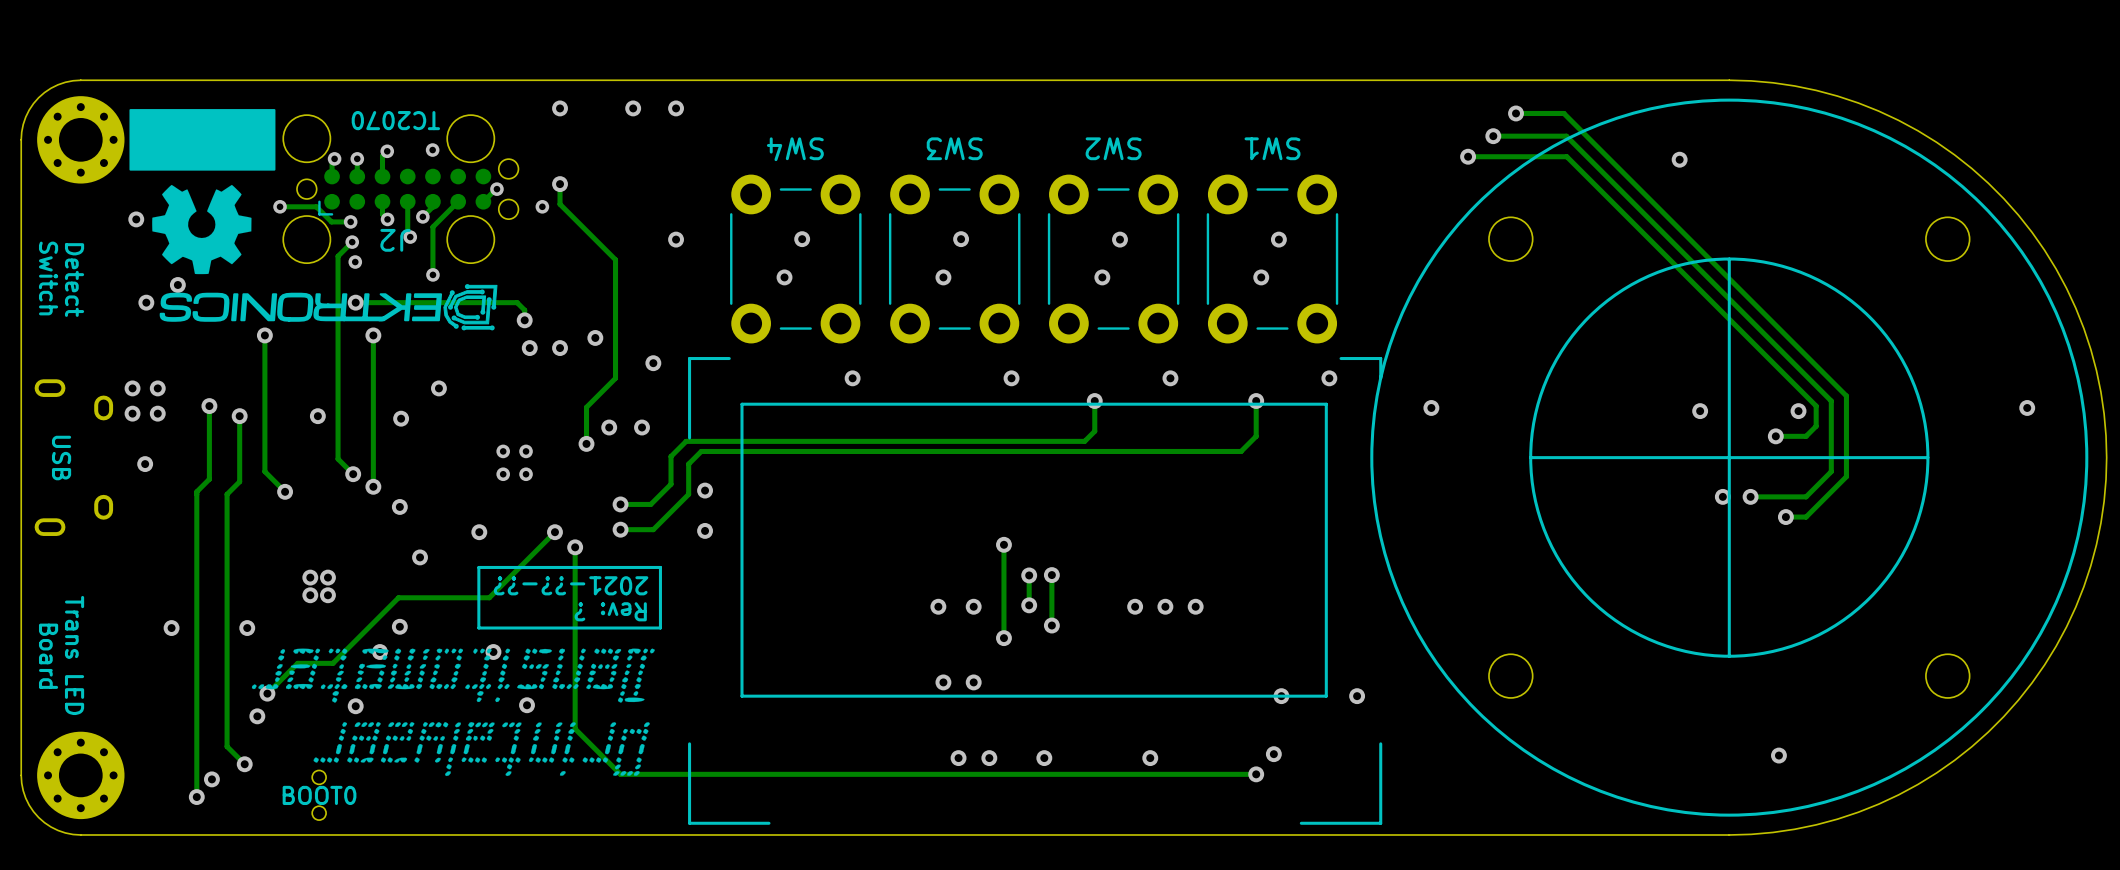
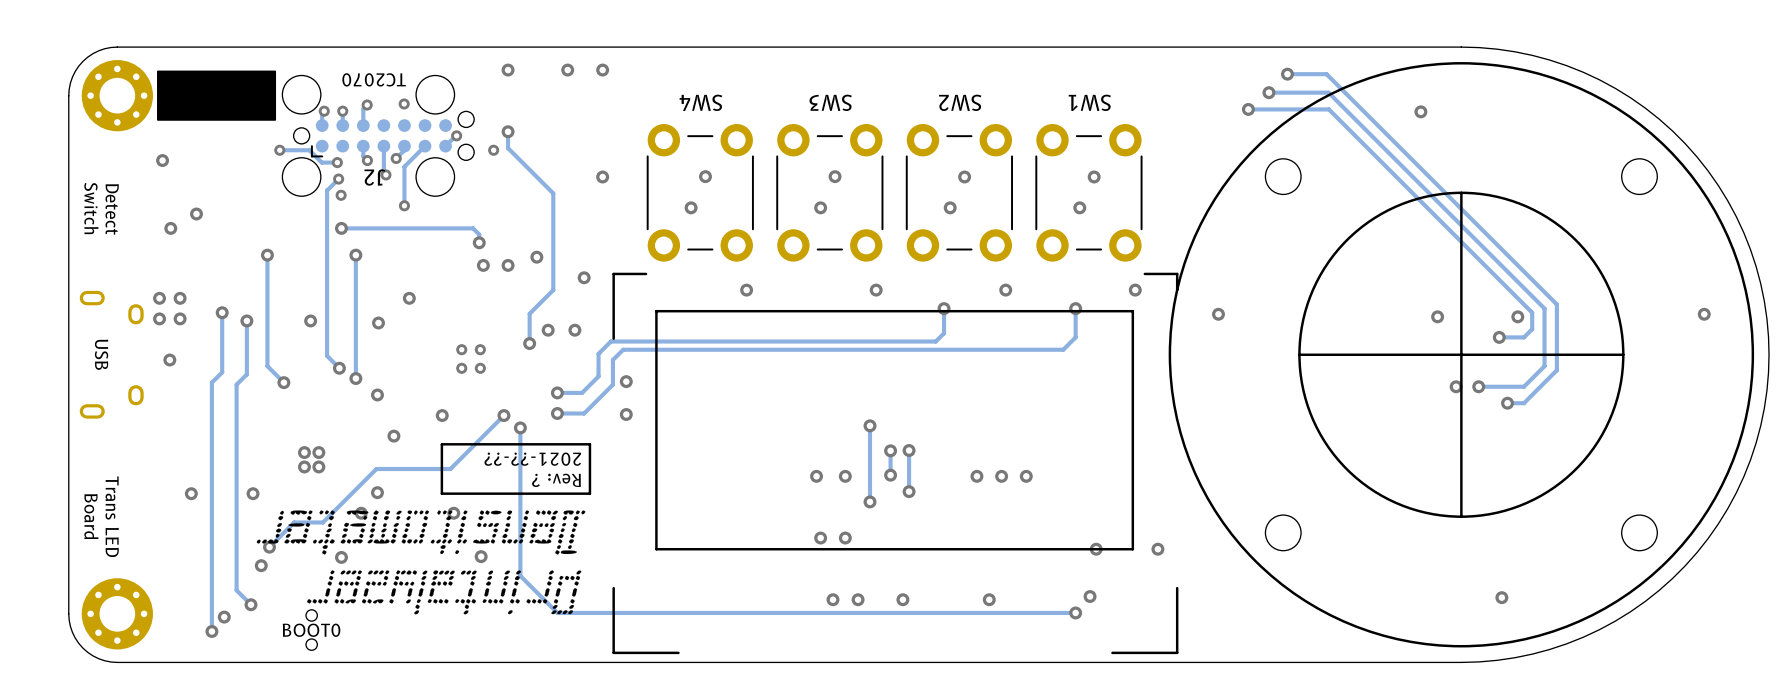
drawing: [152, 184, 498, 331] -> none

